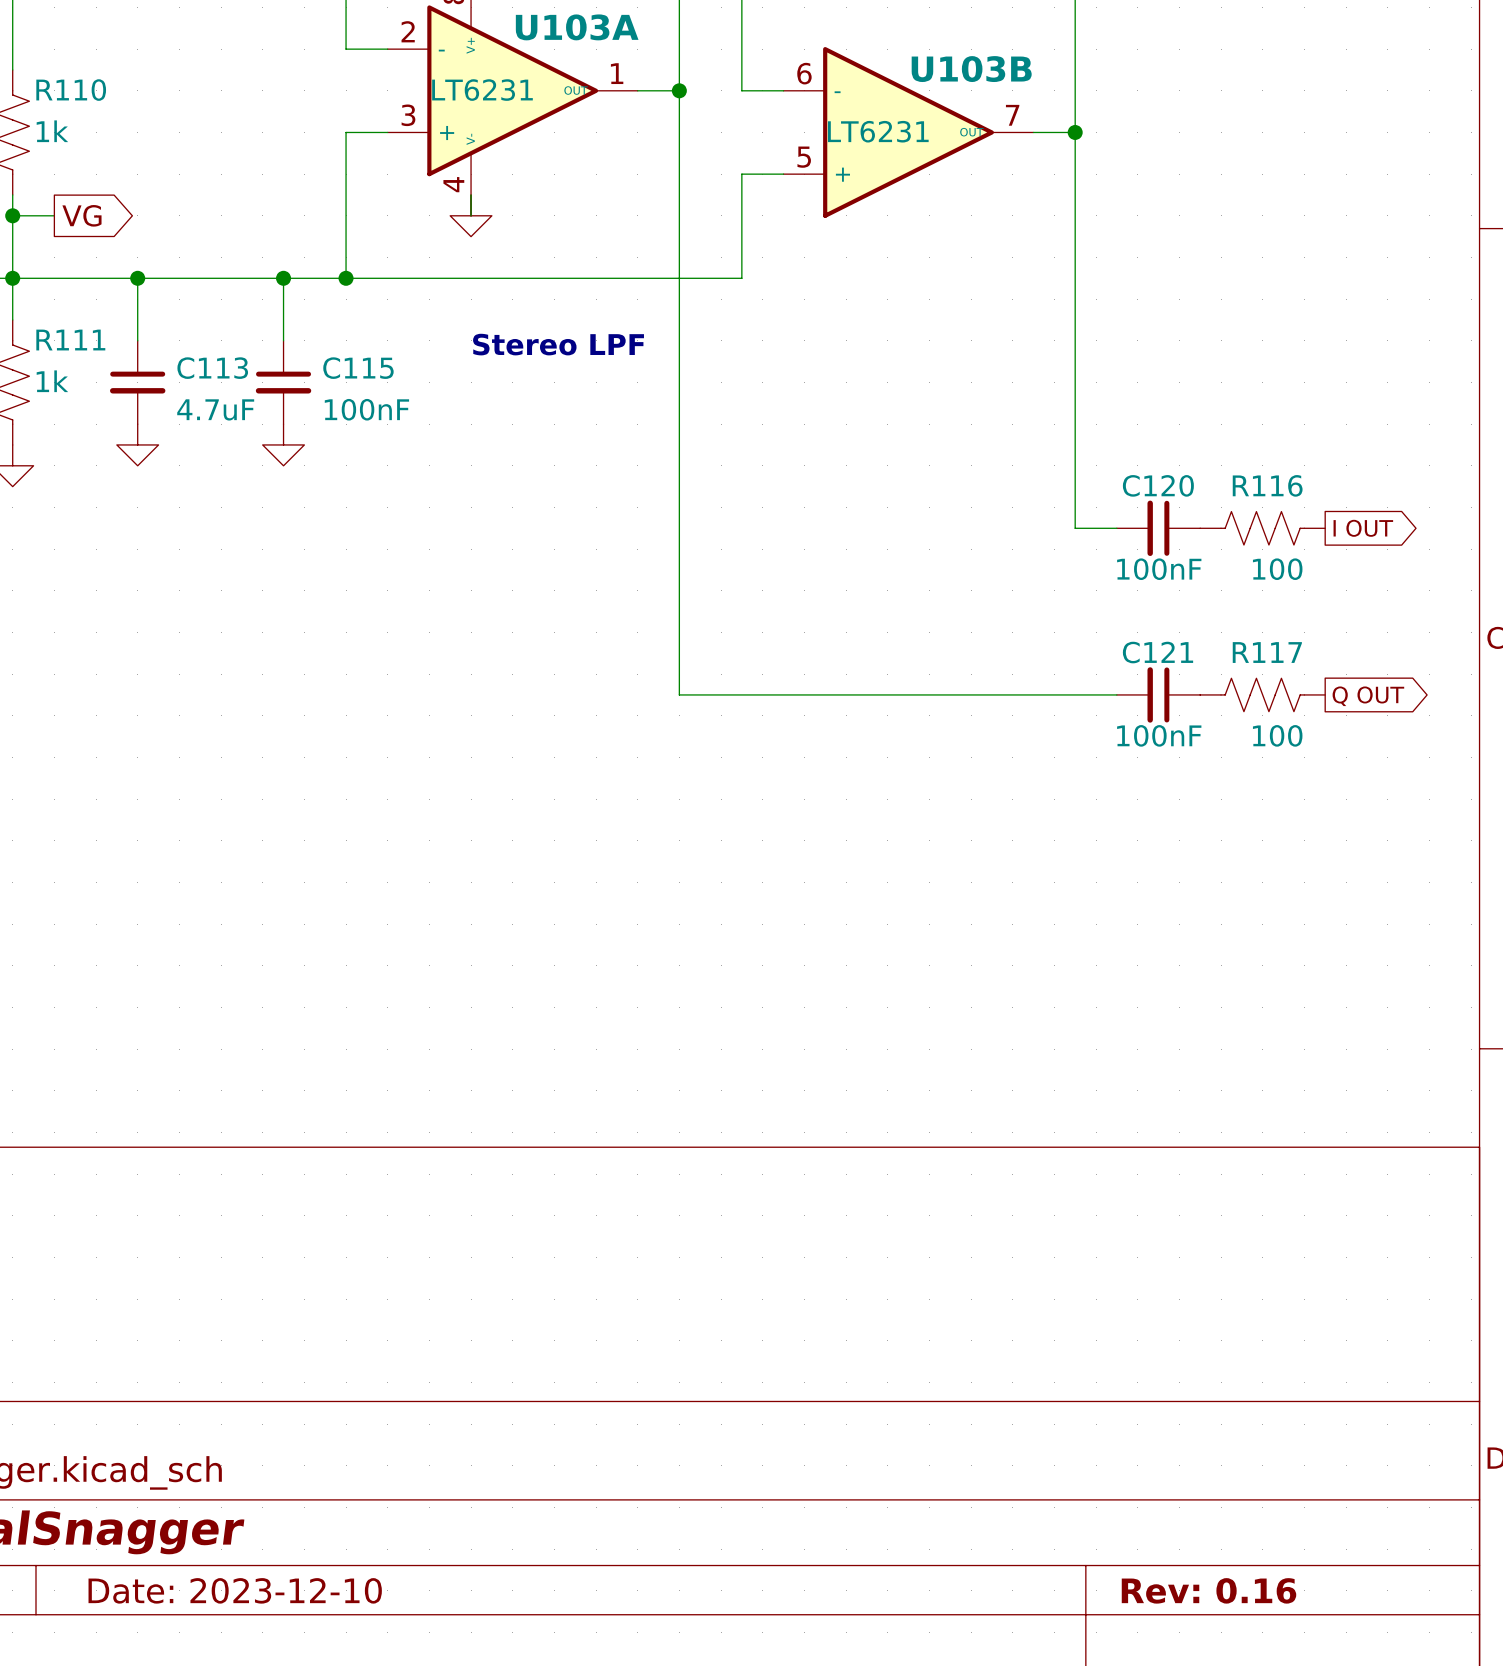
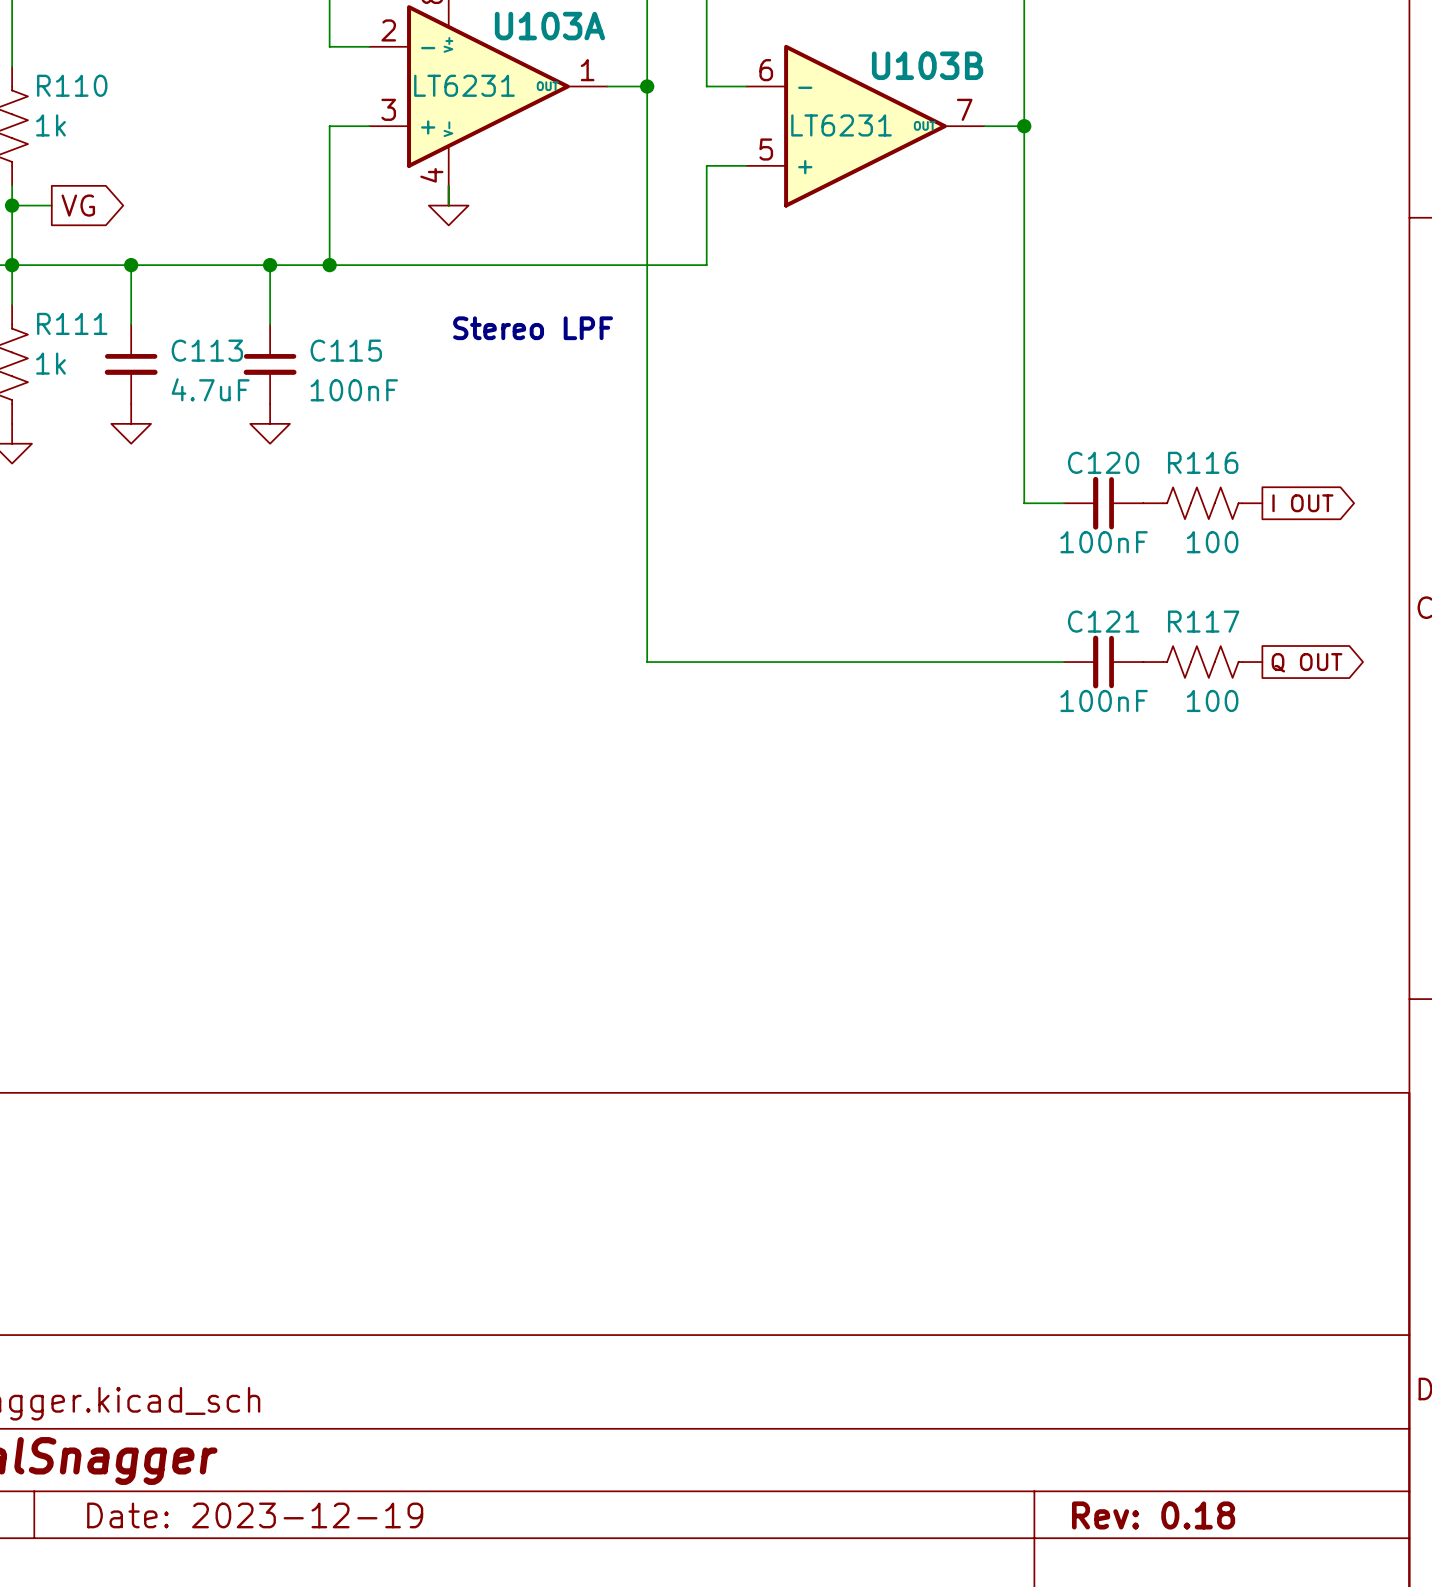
title block: Date: 2023-12-10 (235, 1590) -> Date: 2023-12-19 (255, 1515)
title block: Rev: 0.16 (1209, 1590) -> Rev: 0.18 (1153, 1515)

